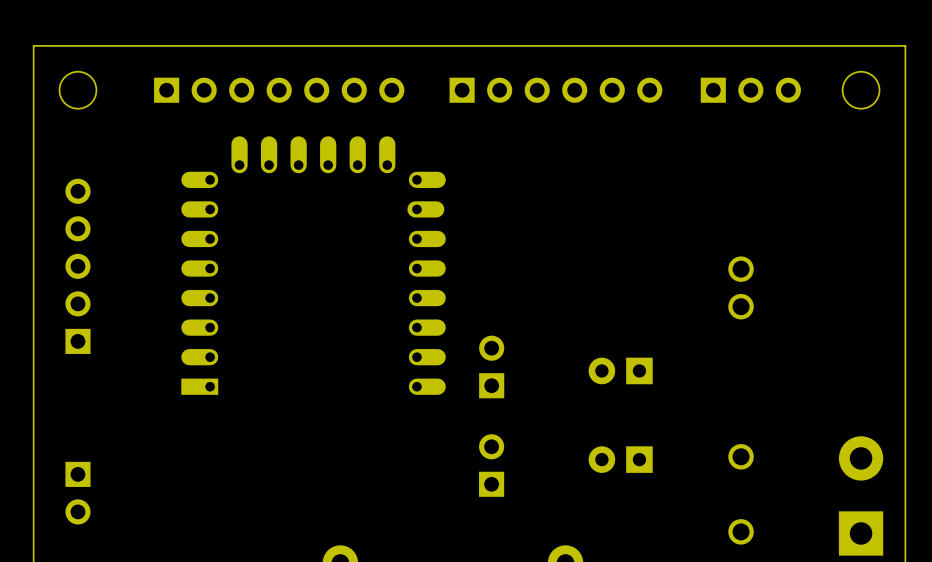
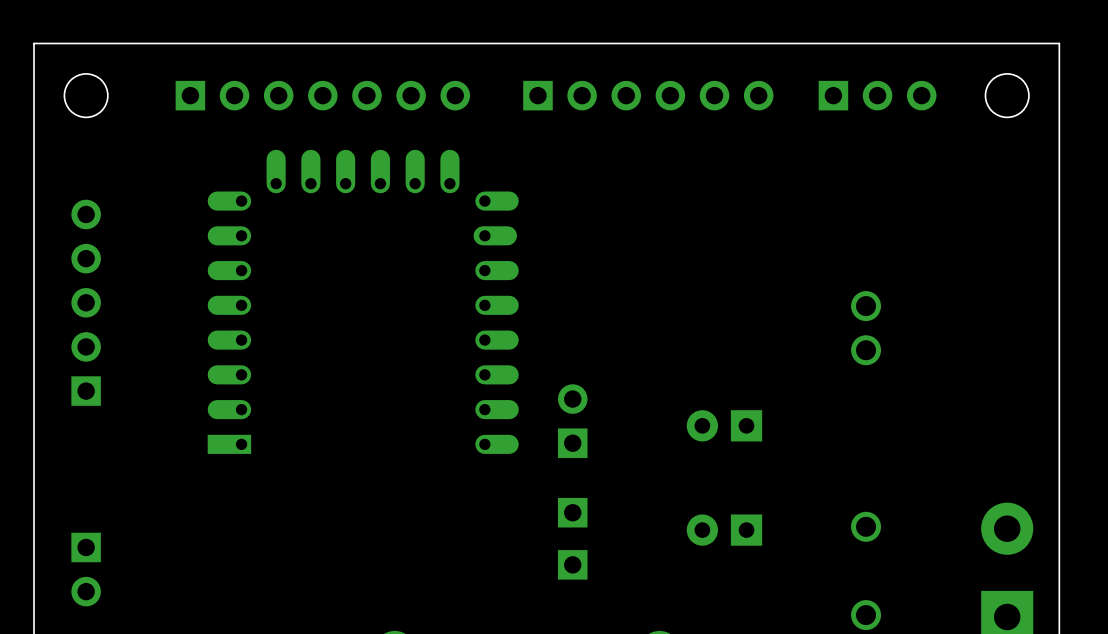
part: none -> (572, 512)
part: (491, 465) -> none
part: none -> (572, 564)

